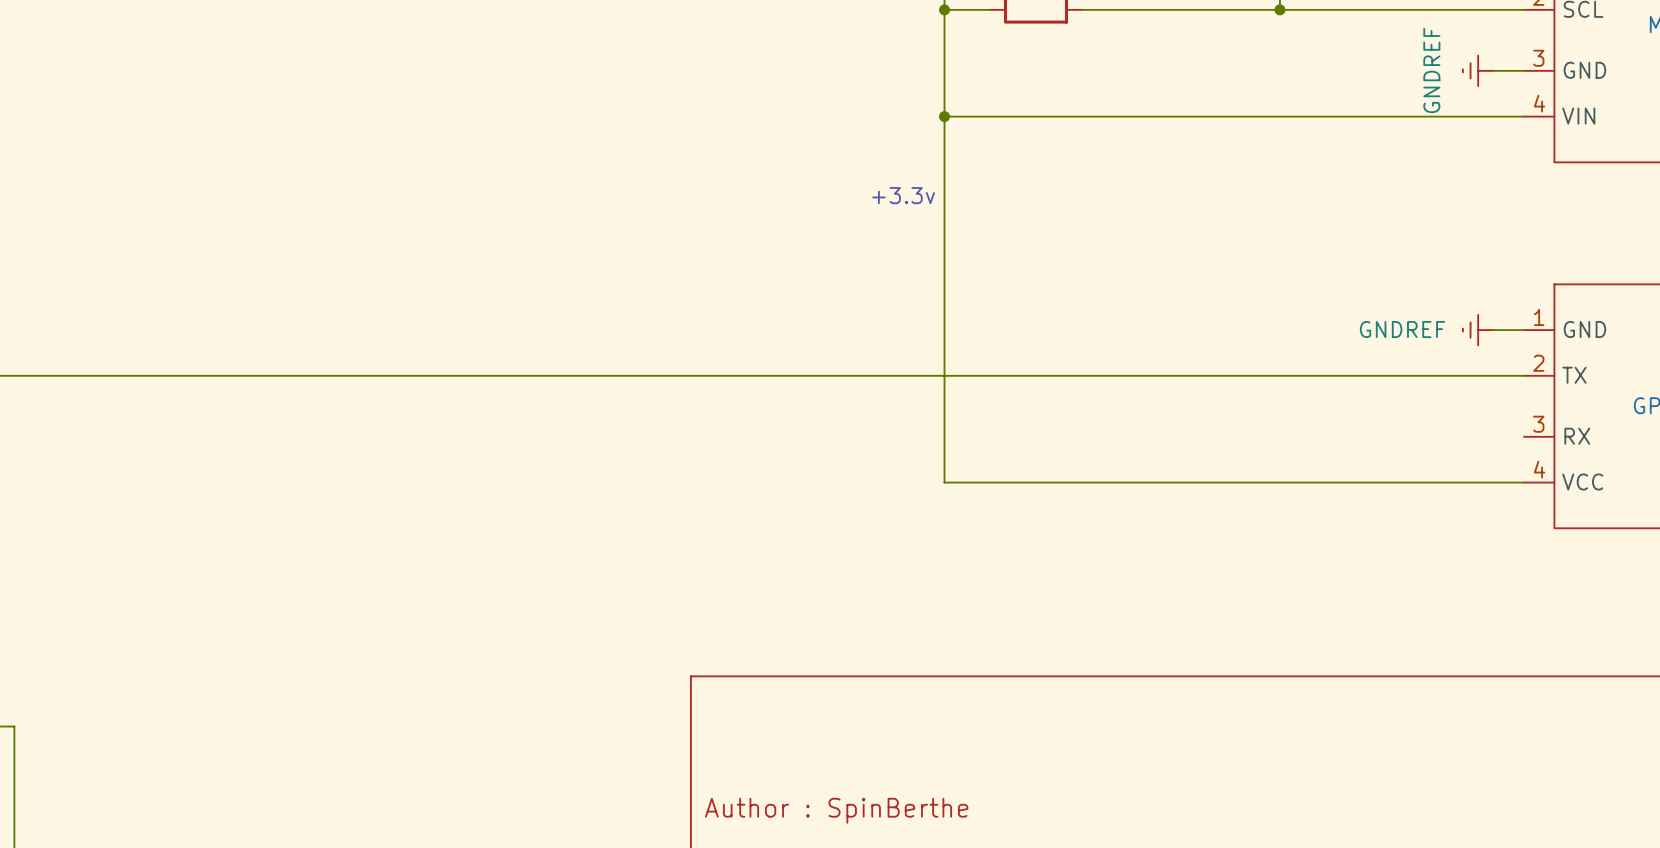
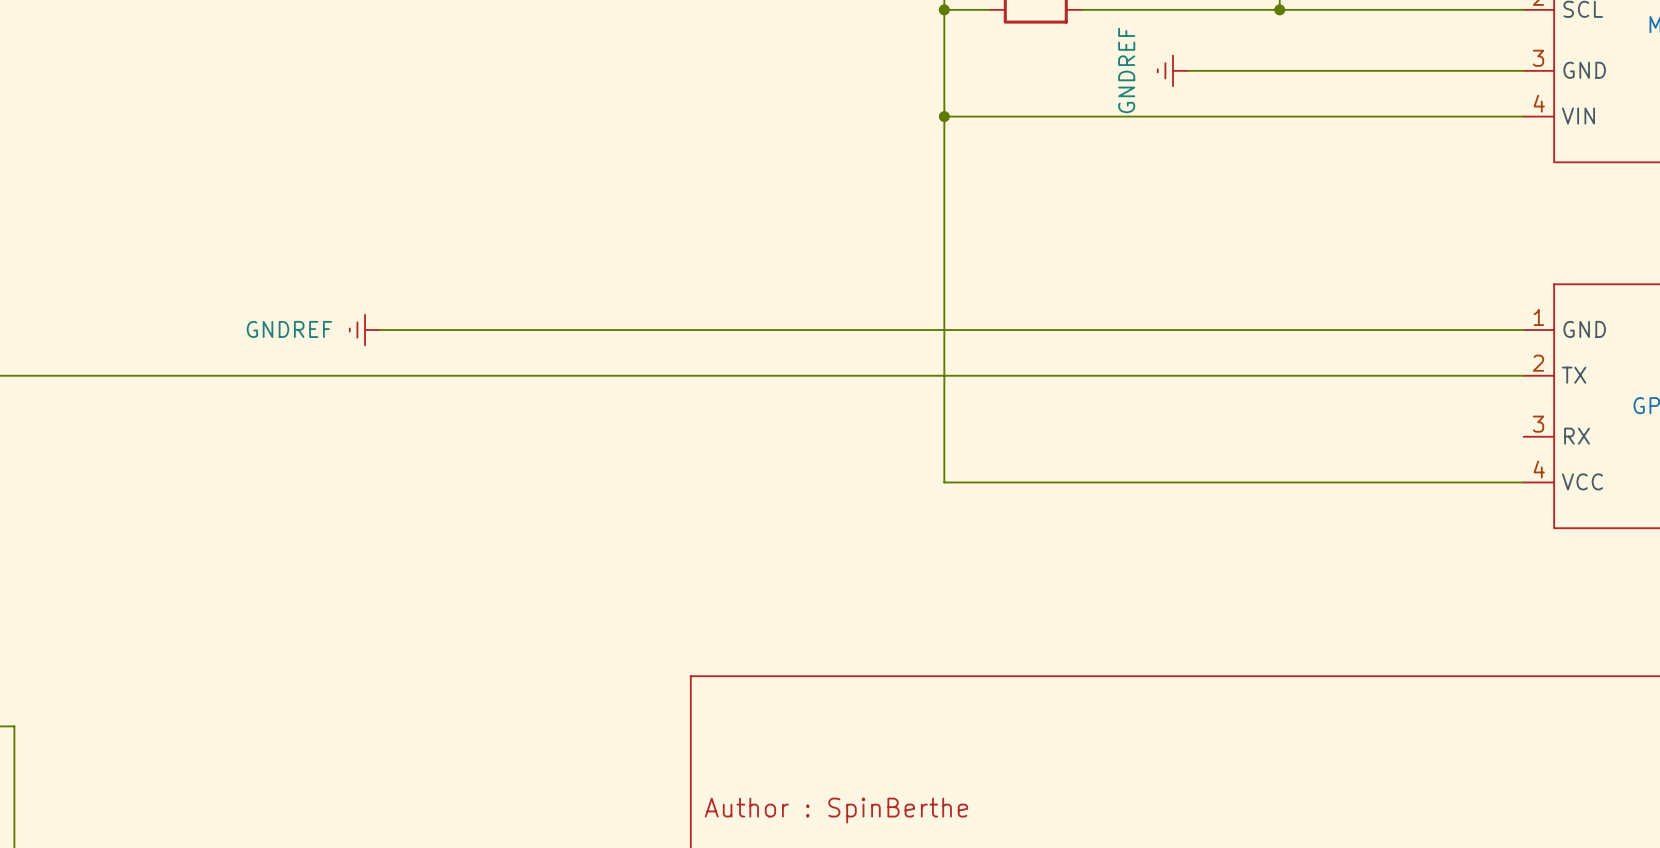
power symbol: none -> GNDREF (1173, 70)
wire: none -> (1188, 70) (1493, 70)
power symbol: GNDREF (1478, 70) -> none
text: +3.3v (903, 195) -> none
power symbol: none -> GNDREF (365, 330)
wire: none -> (380, 330) (1493, 330)
power symbol: GNDREF (1478, 330) -> none

